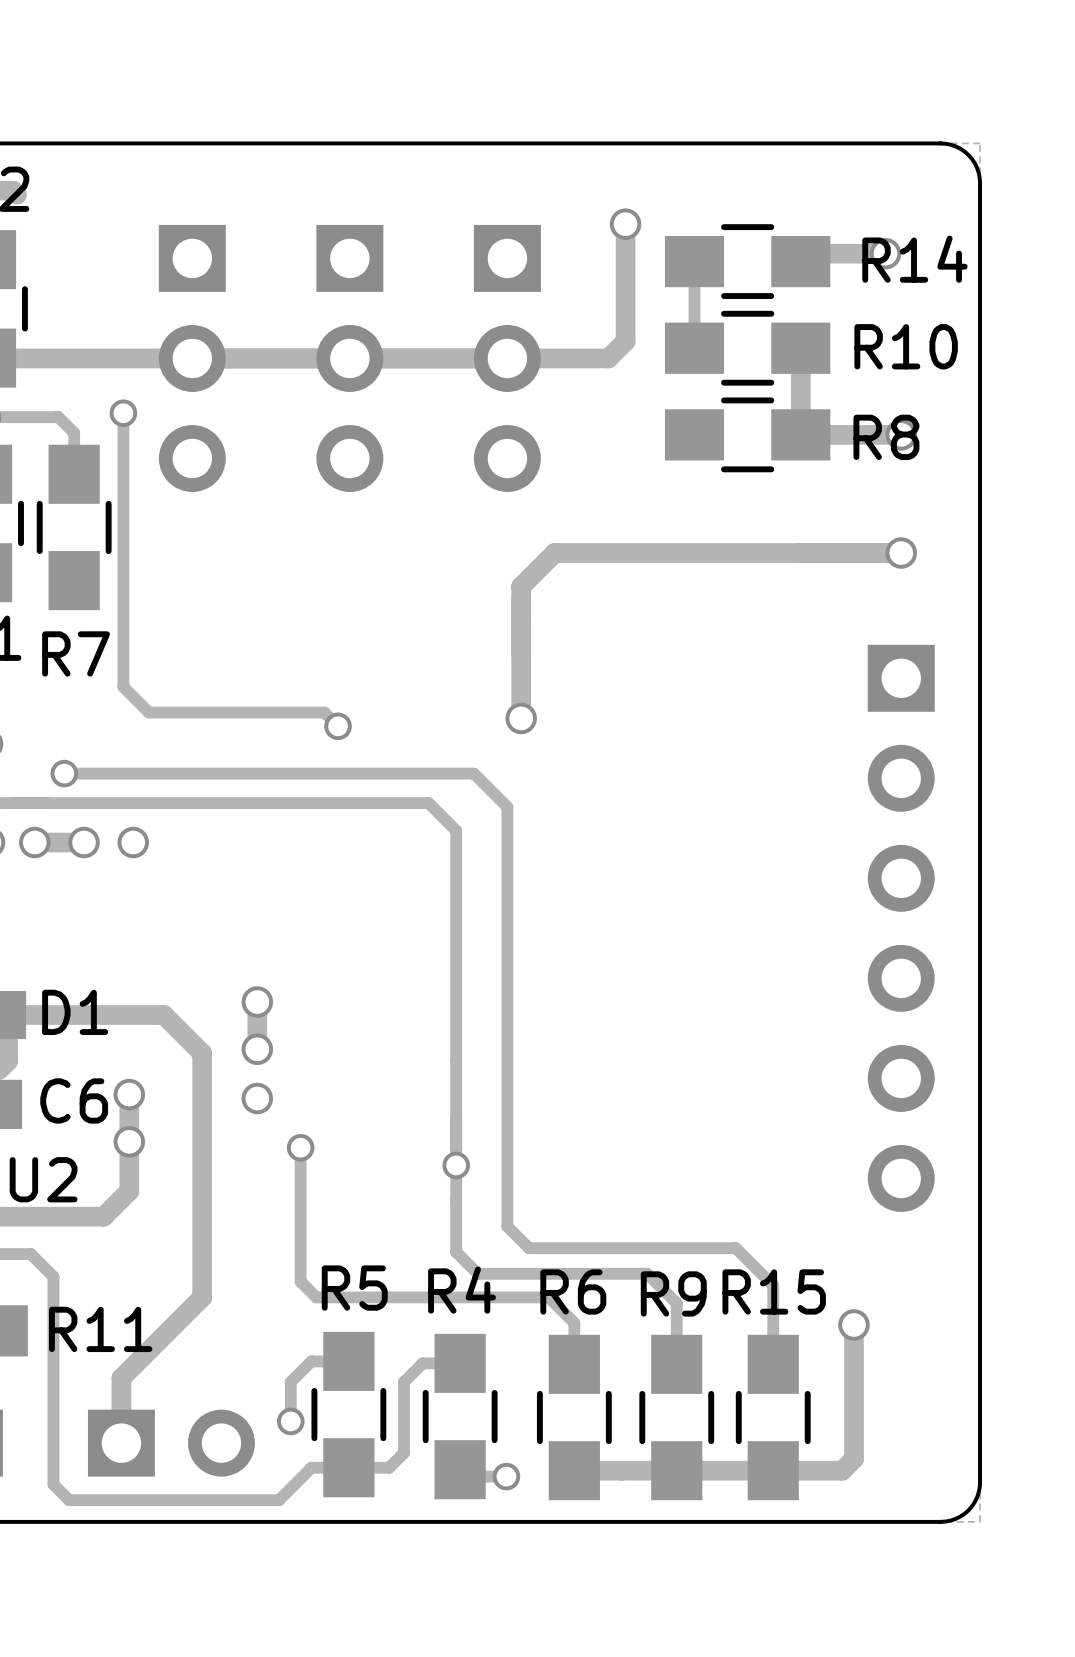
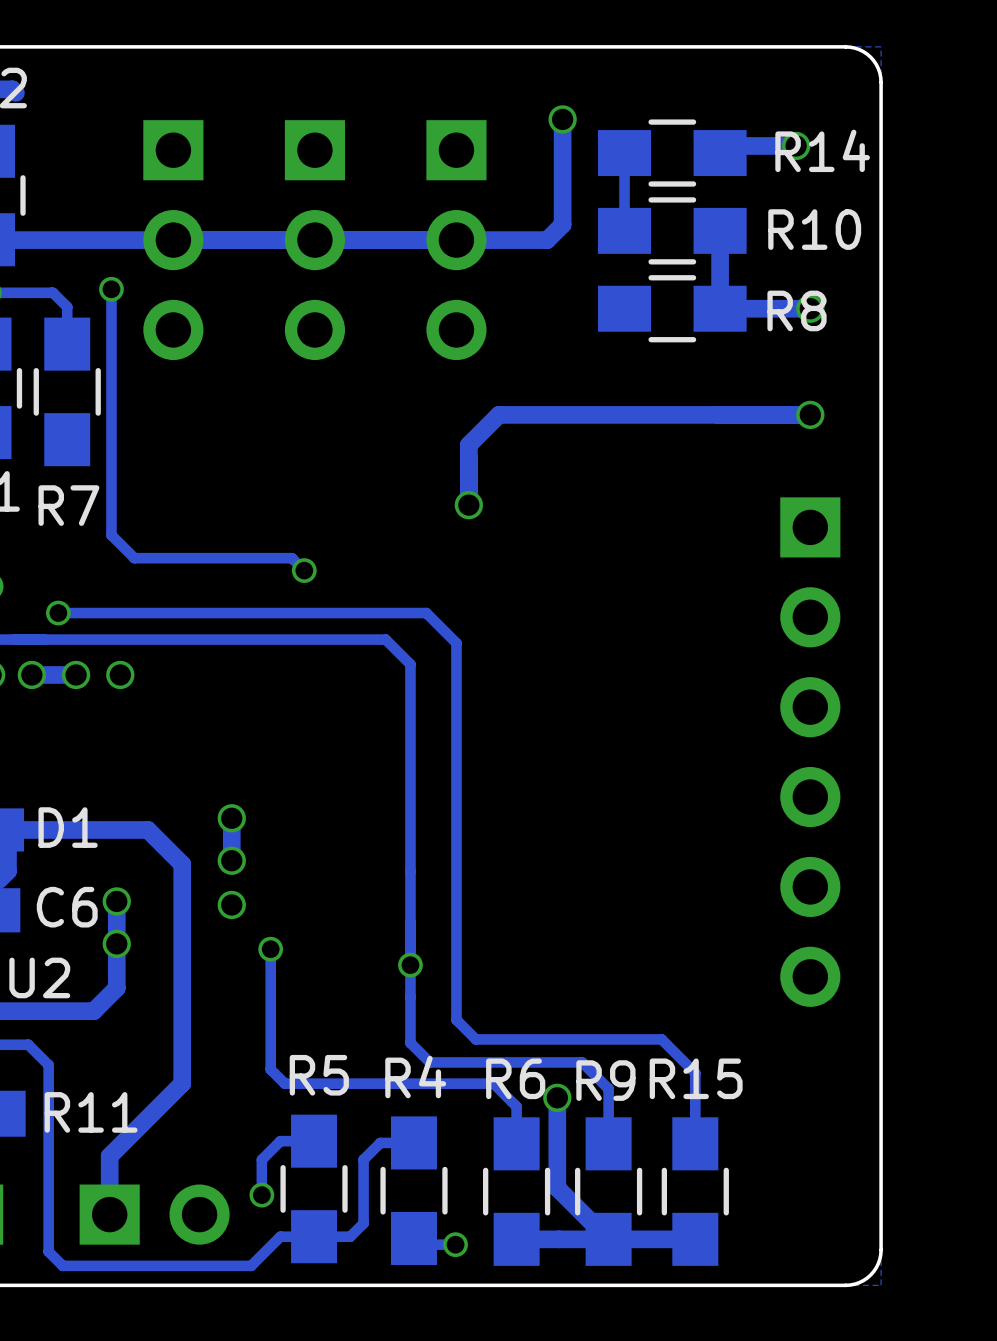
track: (521, 653) (521, 718) -> none
via position: (521, 718) -> (468, 505)
track: none -> (557, 1097) (557, 1188) (608, 1239)
track: (853, 1324) (853, 1458) (842, 1470) (773, 1470) -> none
via position: (853, 1324) -> (557, 1097)

